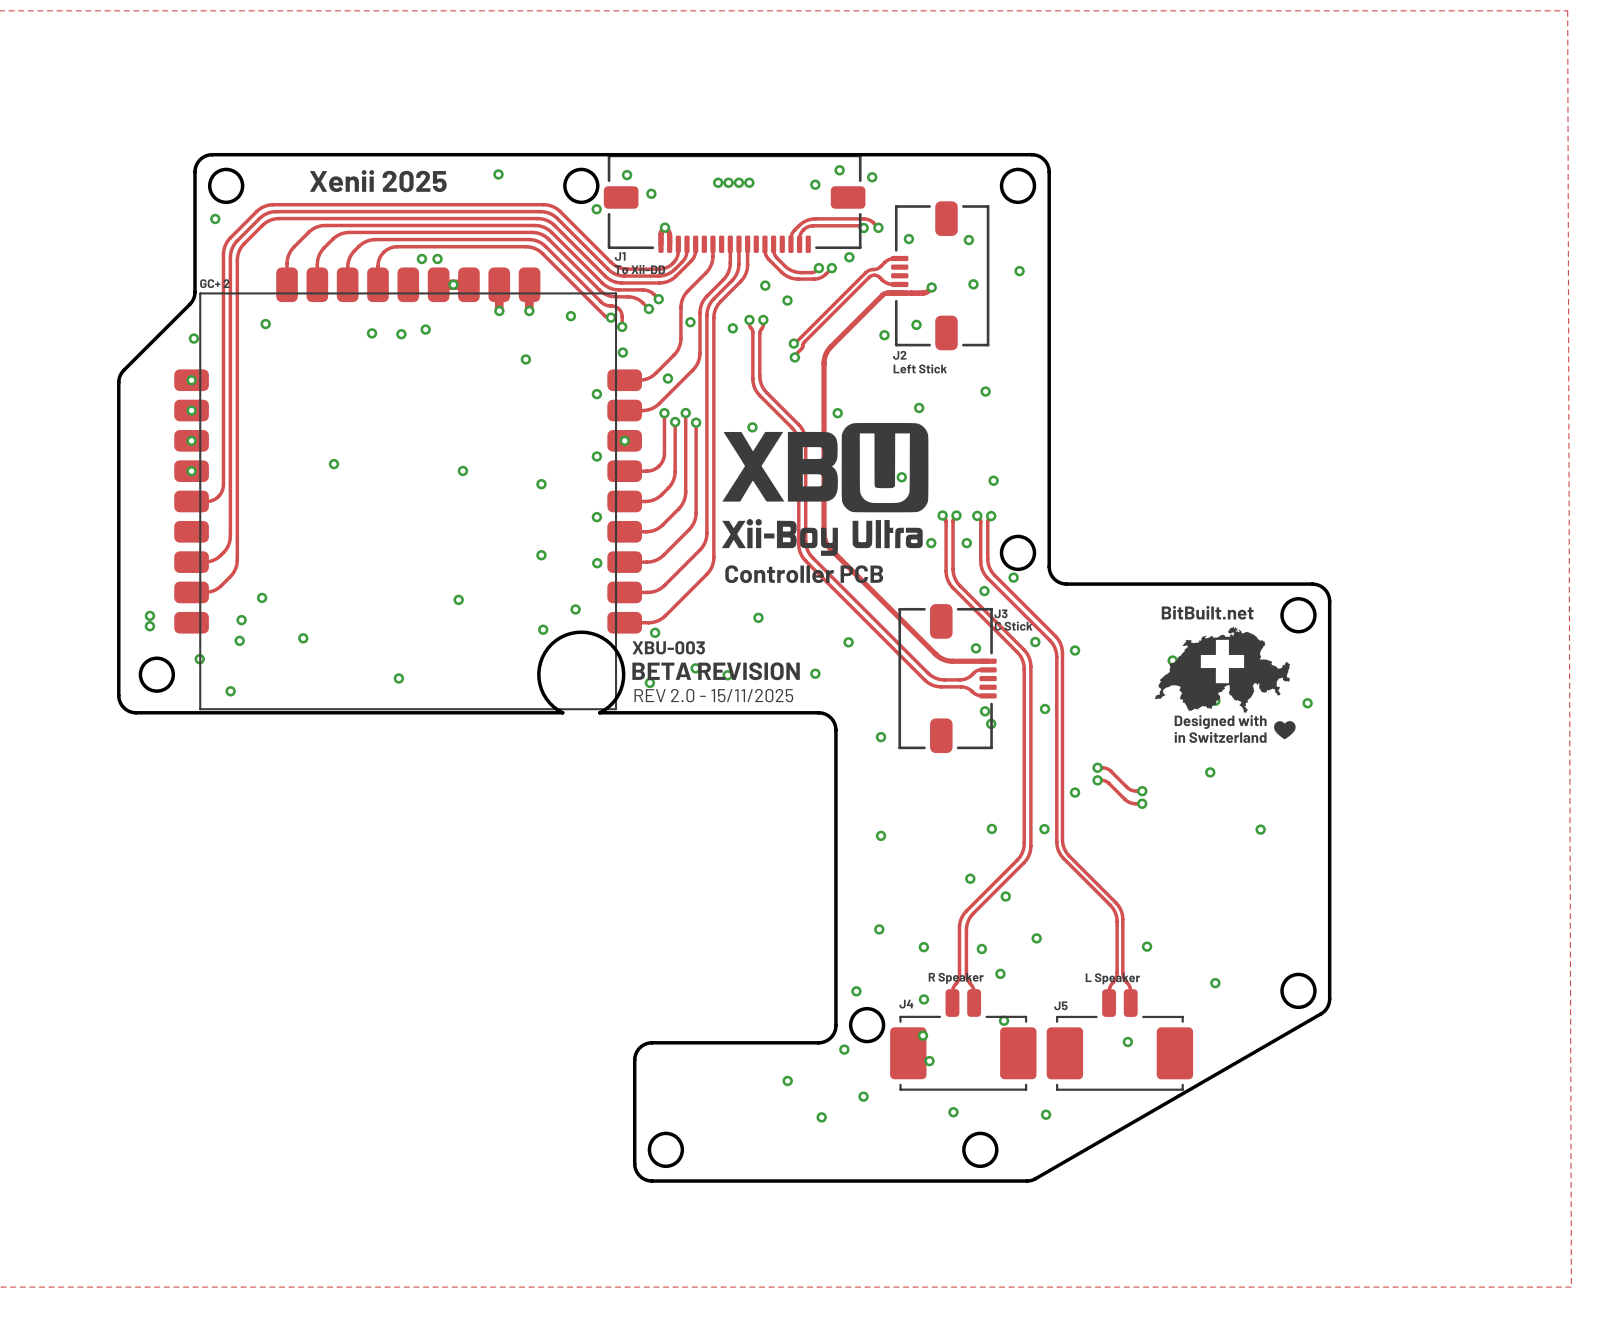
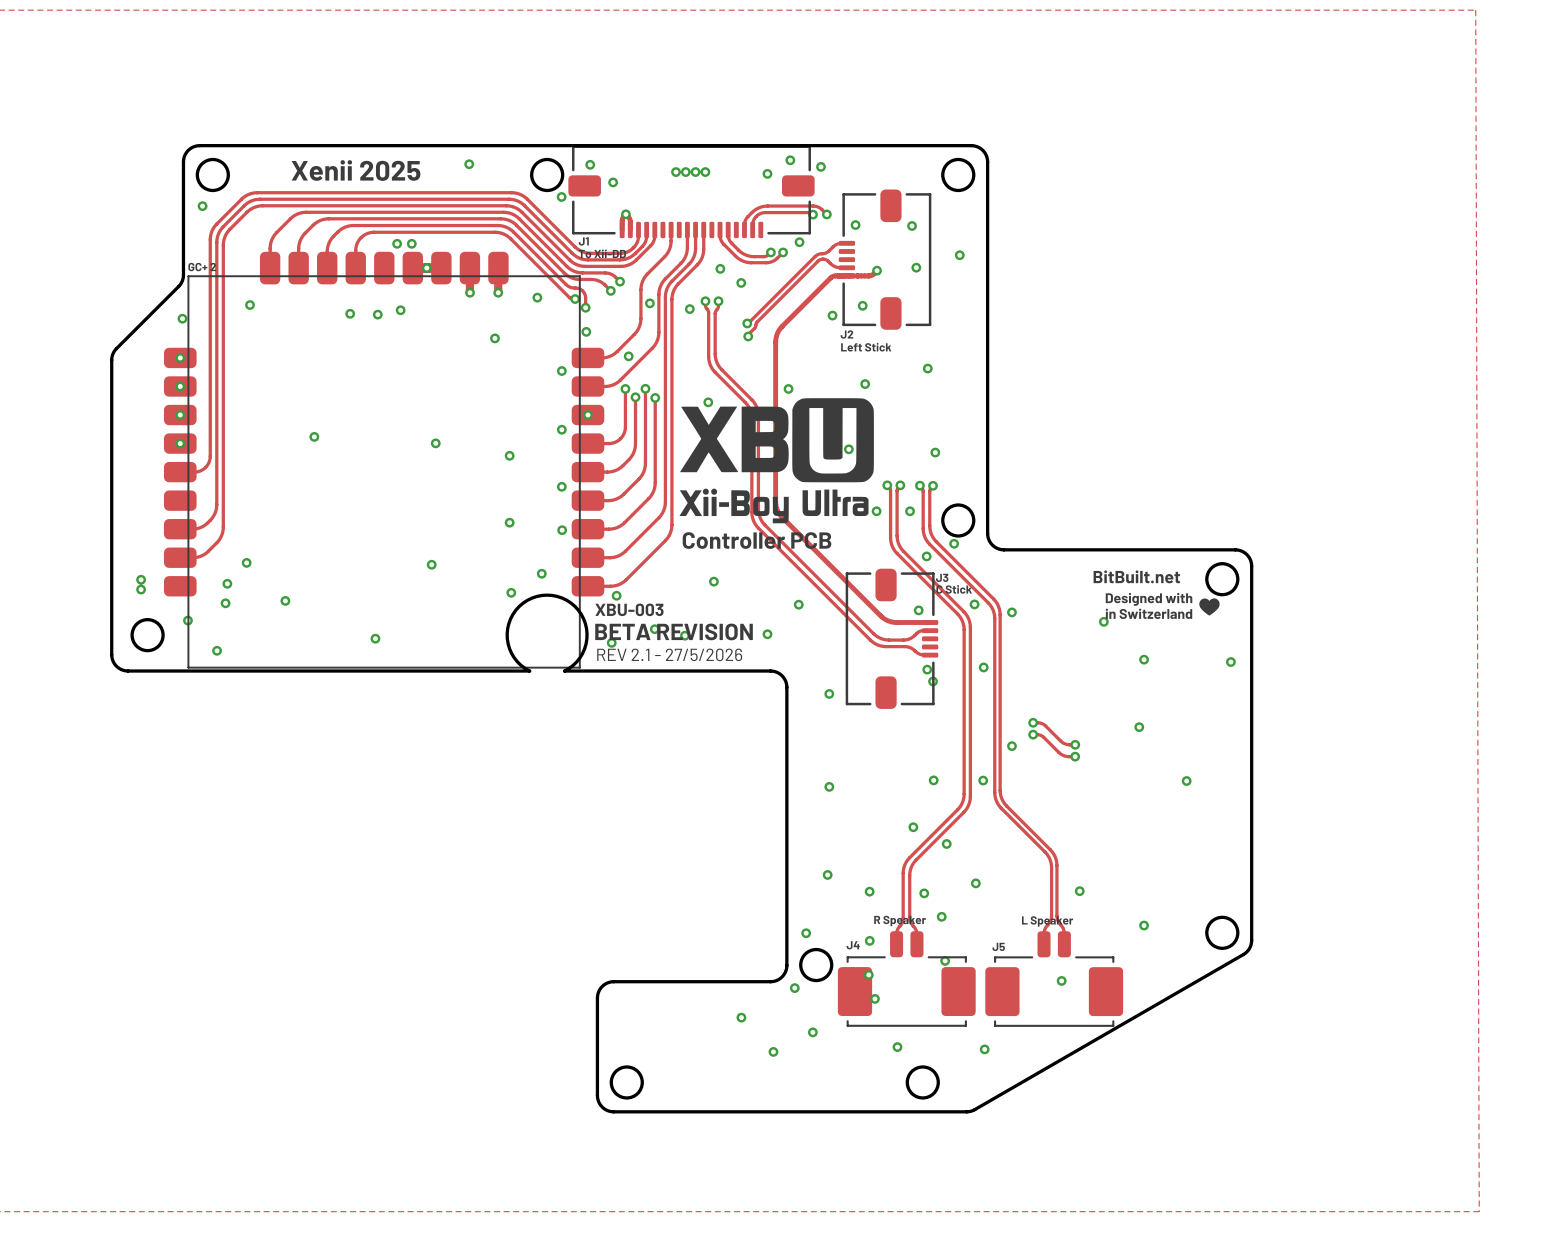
drawing: [1154, 626, 1290, 714] -> none
text: REV 2.0 - 15/11/2025 (713, 695) -> REV 2.1 - 27/5/2026 (669, 654)
text position: Designed with (1220, 722) -> Designed with (1149, 599)
drawing position: (1284, 730) -> (1209, 607)
text position: in Switzerland (1220, 737) -> in Switzerland (1148, 613)

